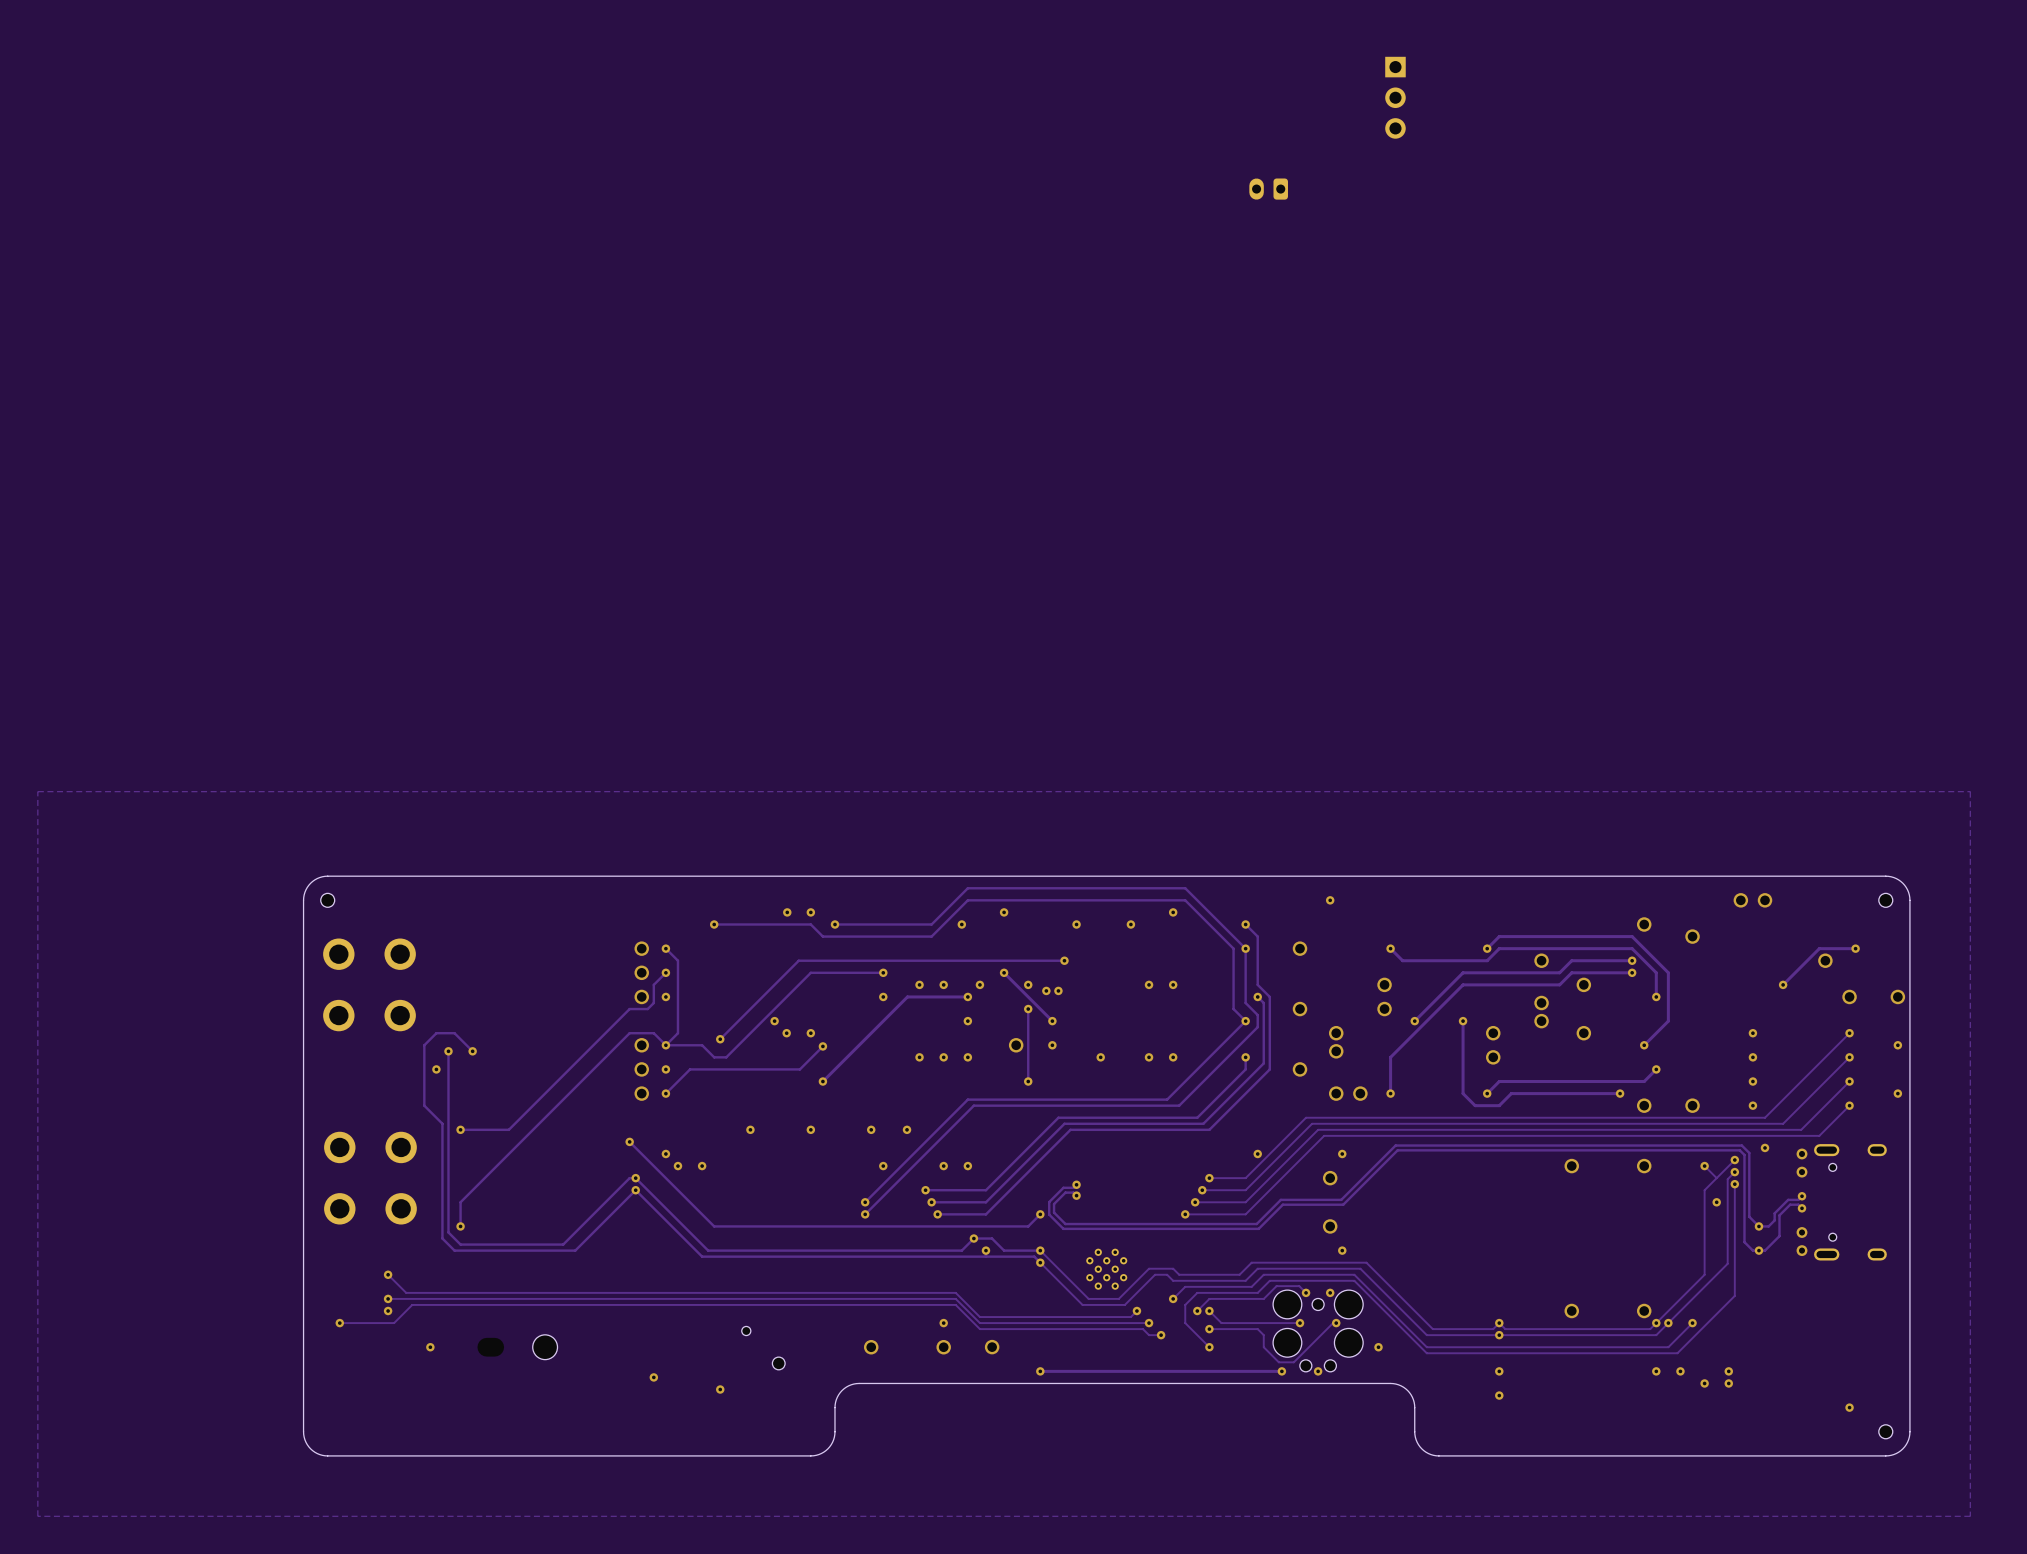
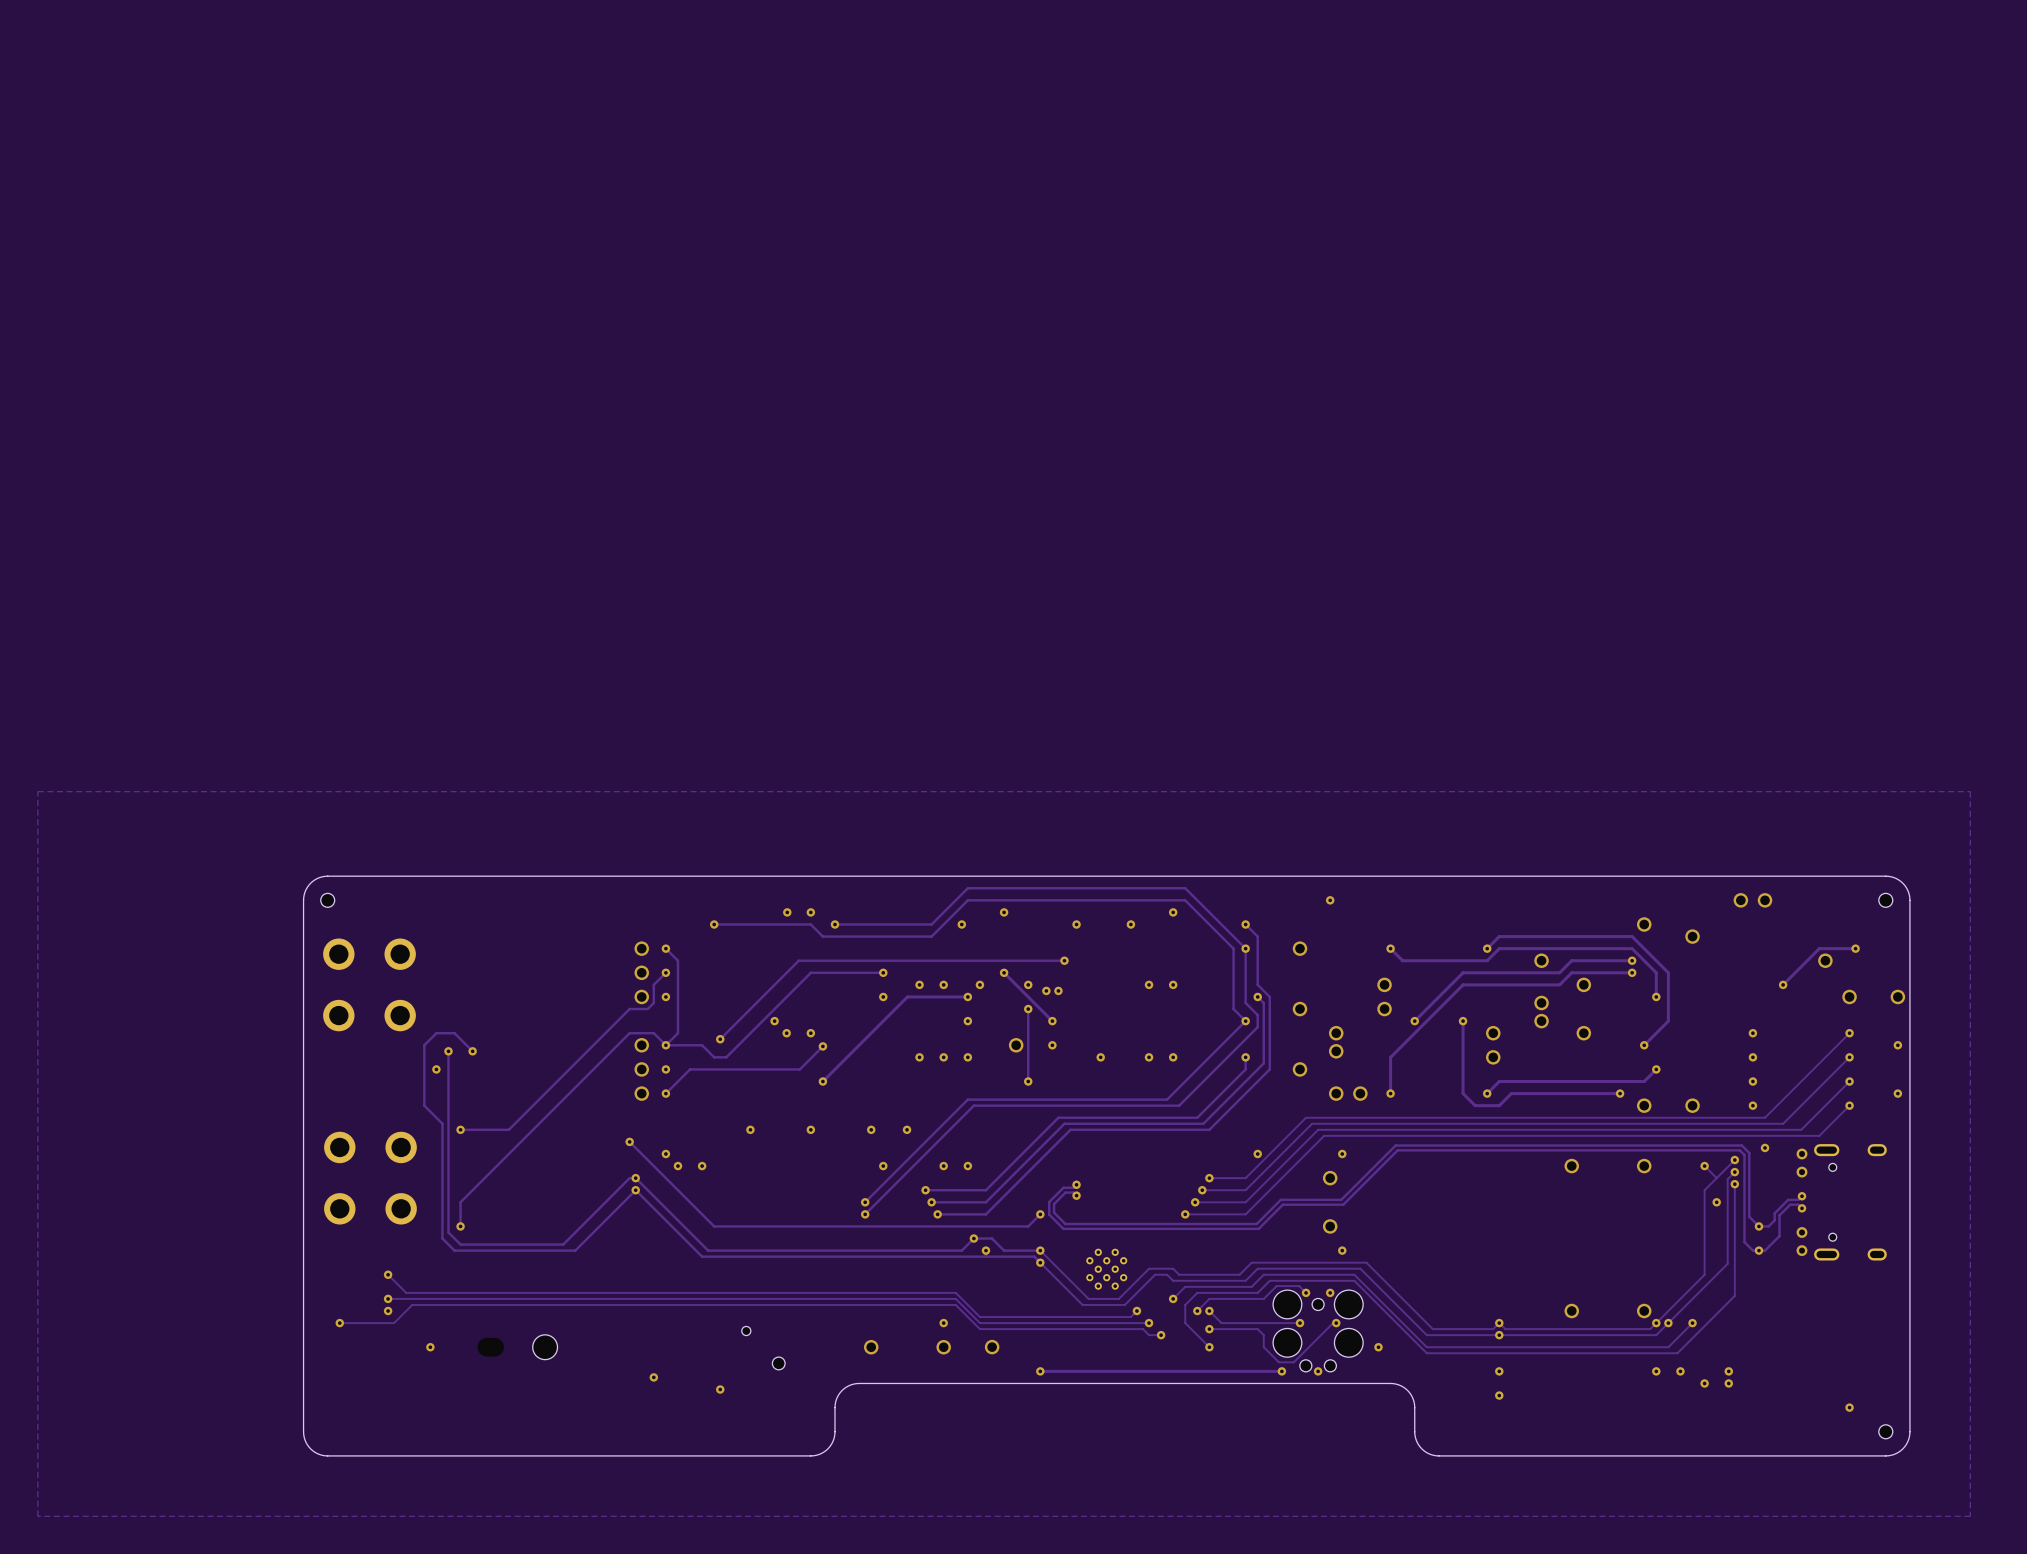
part: (1395, 97) -> none
part: (1268, 189) -> none

